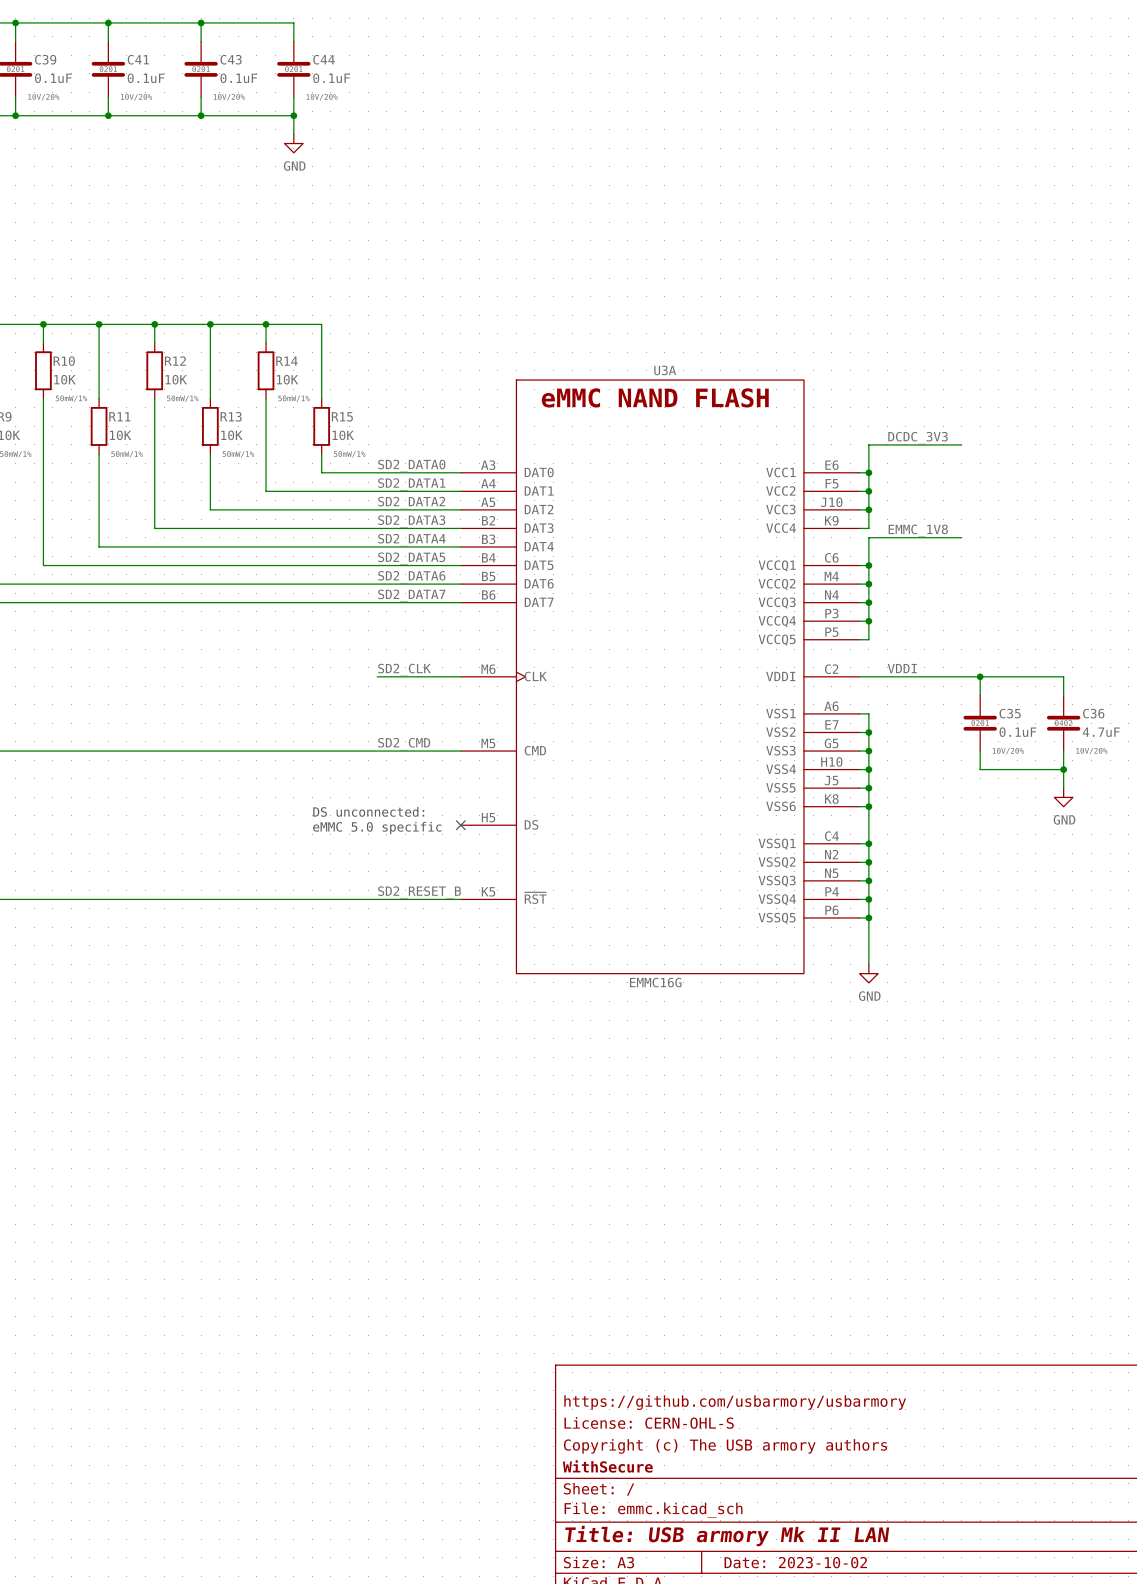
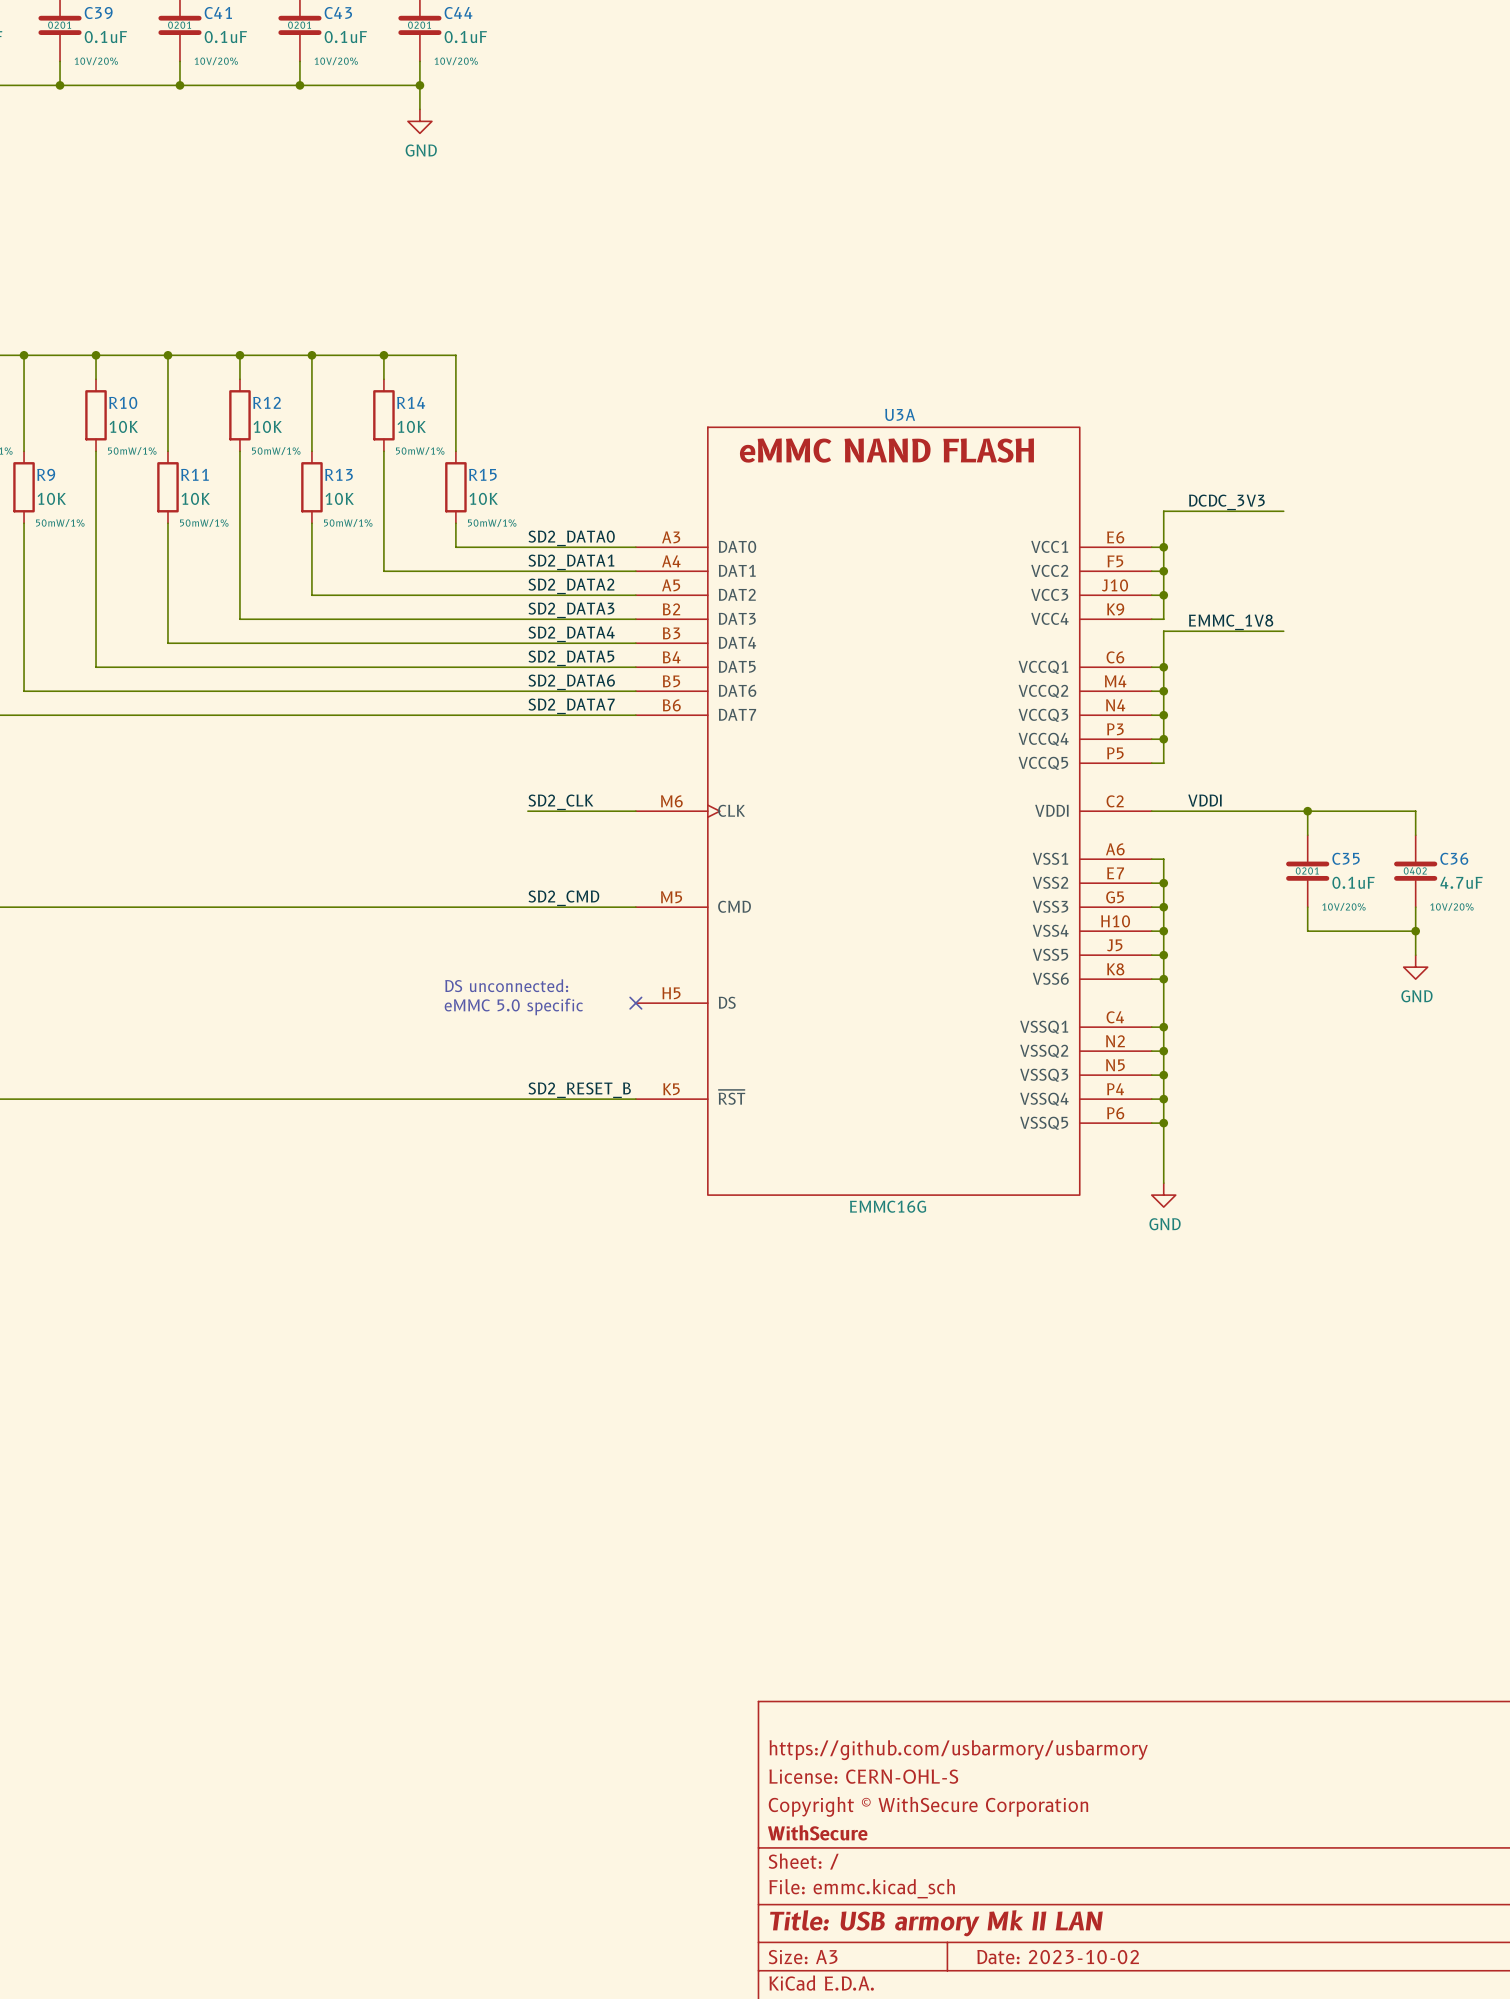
title block: Copyright (c) The USB armory authors (725, 1446) -> Copyright © WithSecure Corporation (928, 1806)

